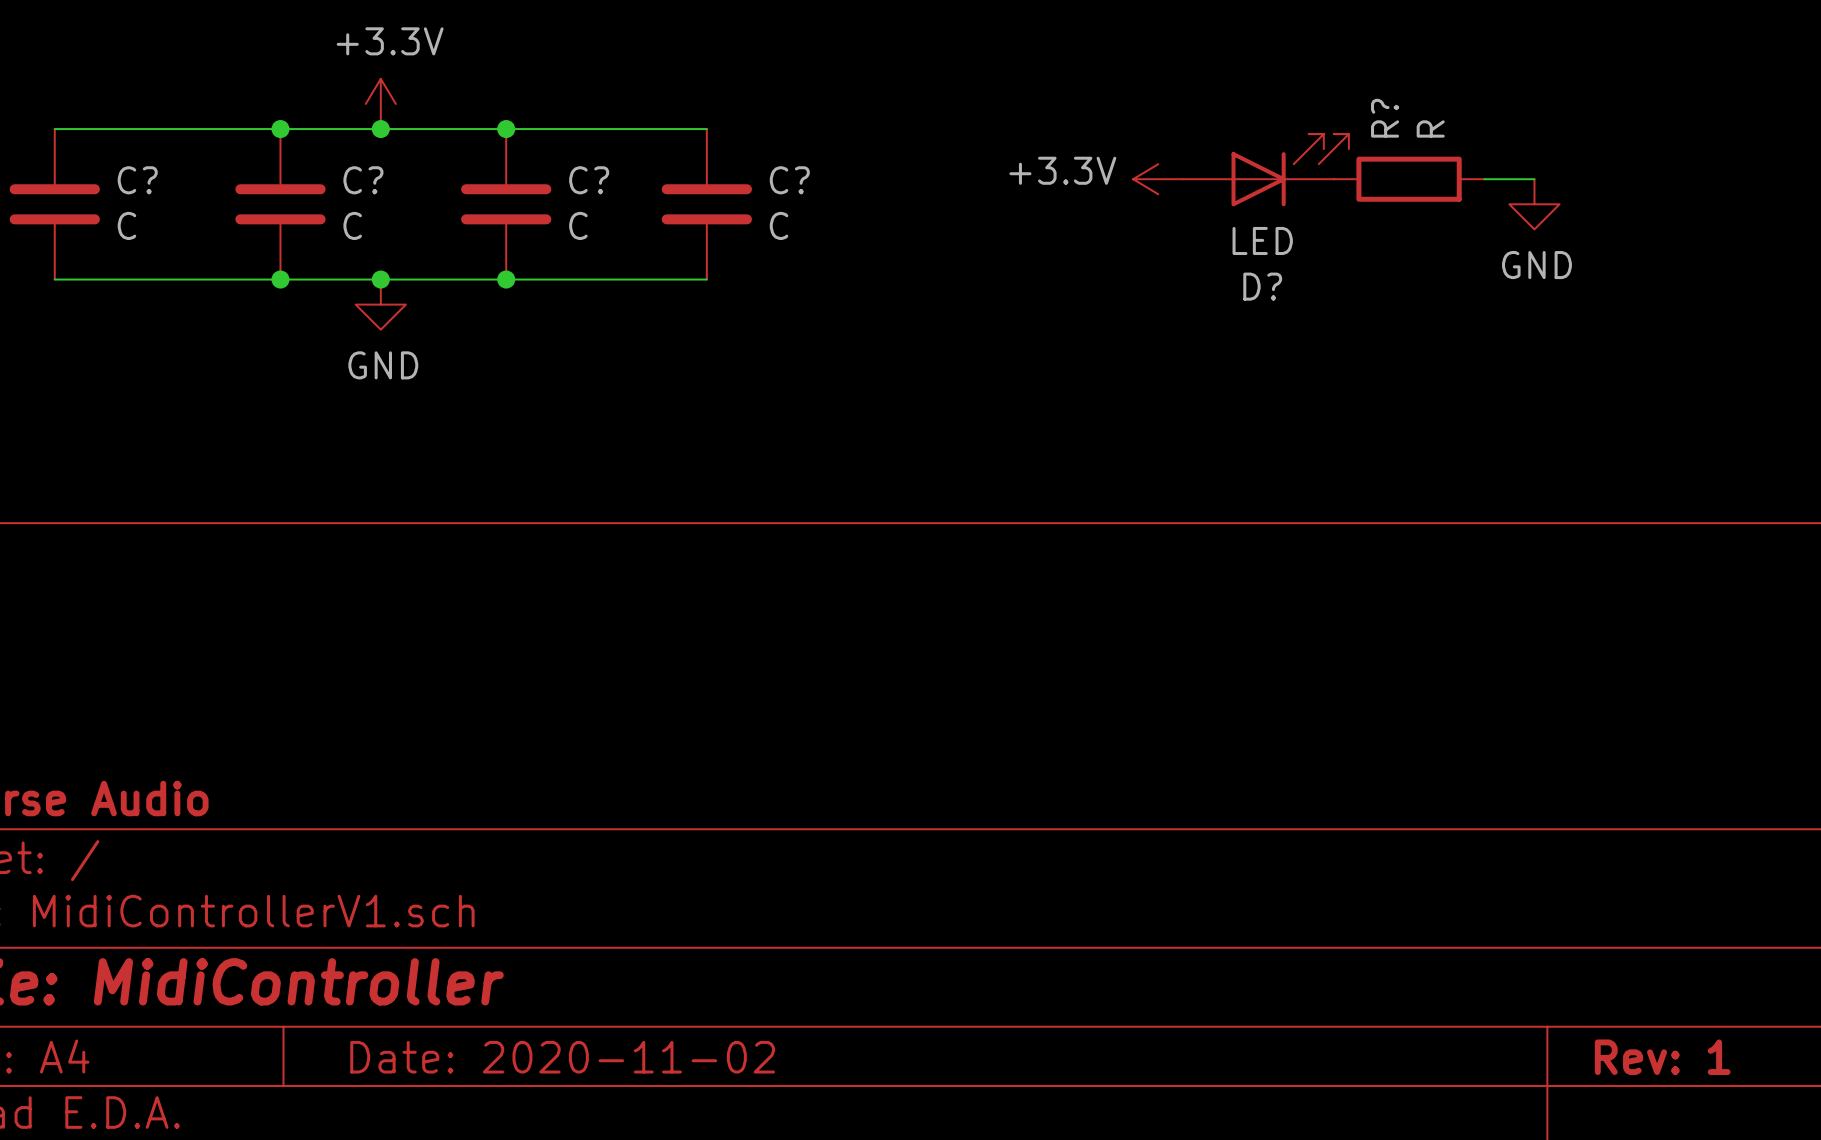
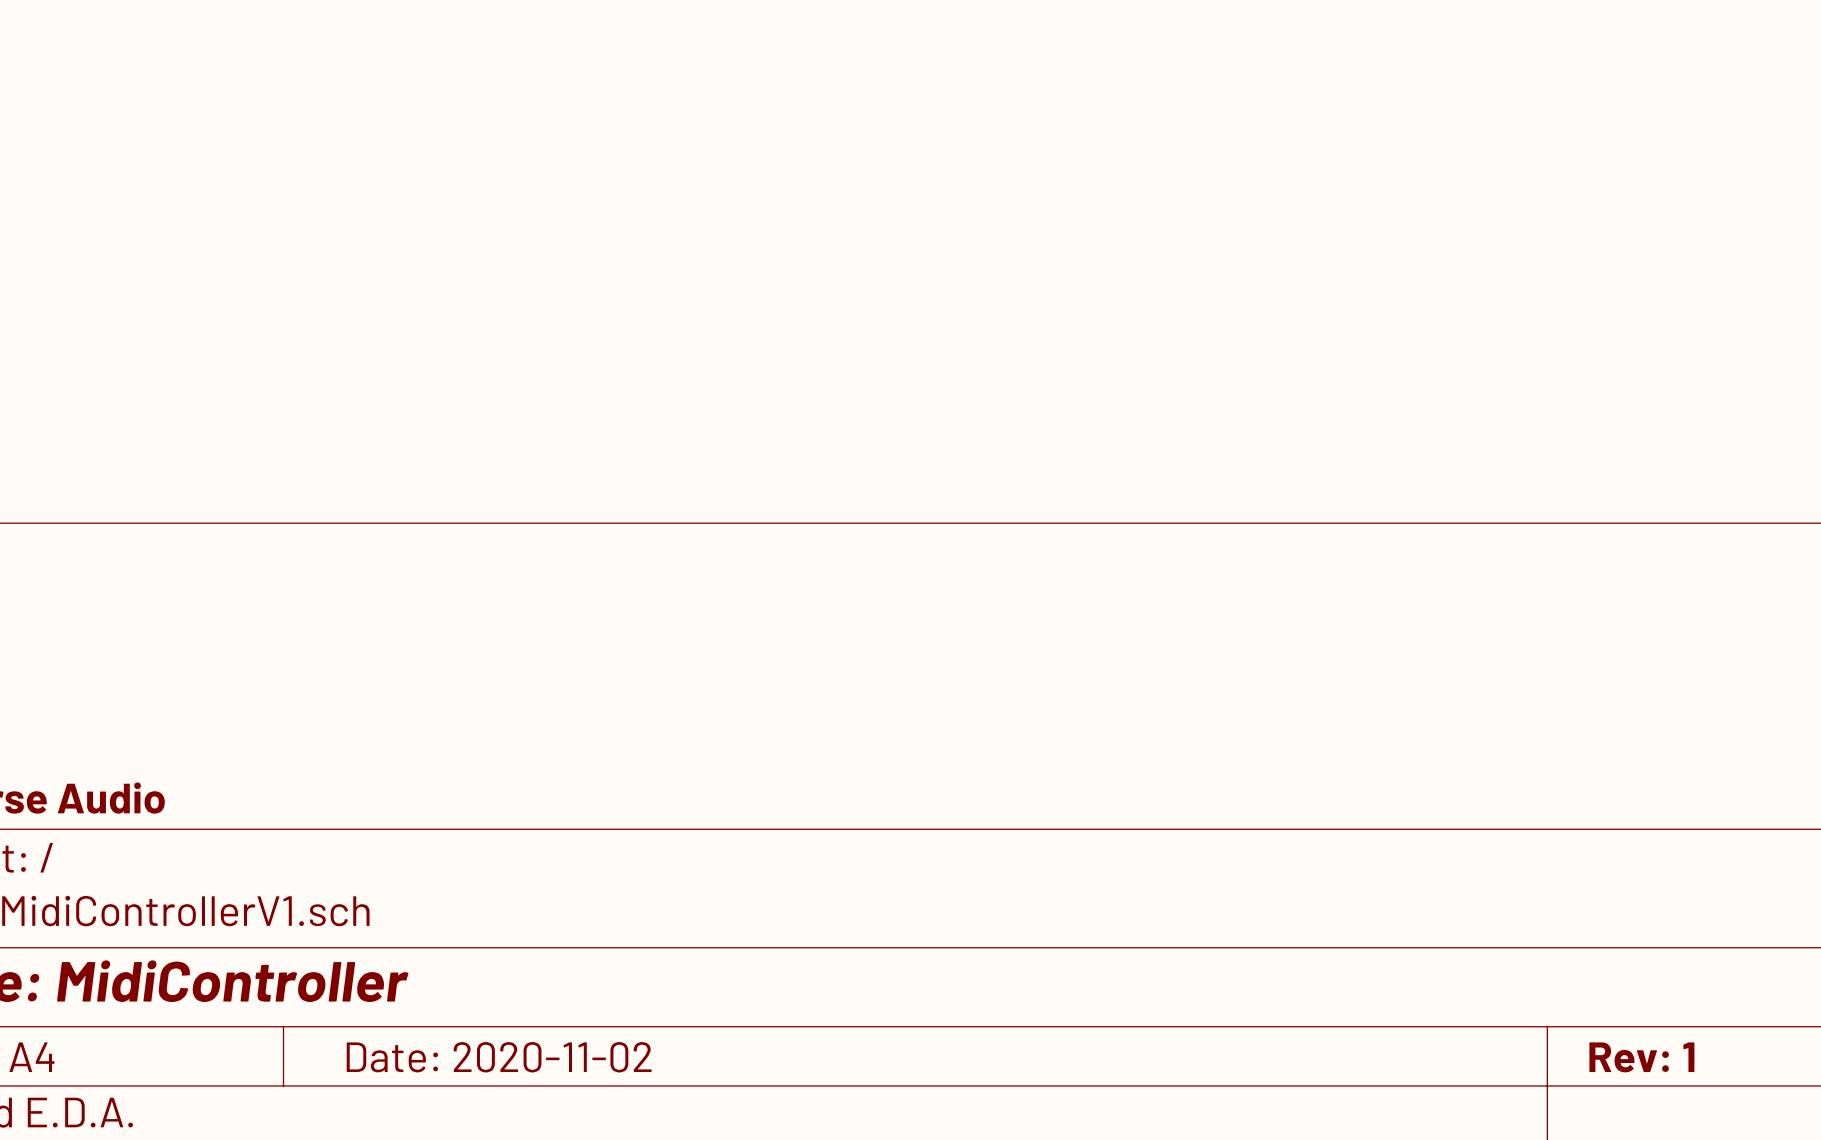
power symbol: +3.3V (380, 103) -> none
wire: (54, 129) (706, 129) -> none
junction: (280, 129) -> none
junction: (380, 129) -> none
junction: (506, 129) -> none
D?: LED (1266, 170) -> none
power symbol: +3.3V (1158, 179) -> none
R?: R (1409, 179) -> none
wire: (1484, 179) (1534, 179) -> none
C?: C (54, 204) -> none
C?: C (280, 204) -> none
C?: C (506, 204) -> none
C?: C (706, 204) -> none
power symbol: GND (1534, 204) -> none
wire: (54, 279) (706, 279) -> none
junction: (280, 279) -> none
junction: (380, 279) -> none
junction: (506, 279) -> none
power symbol: GND (380, 304) -> none

